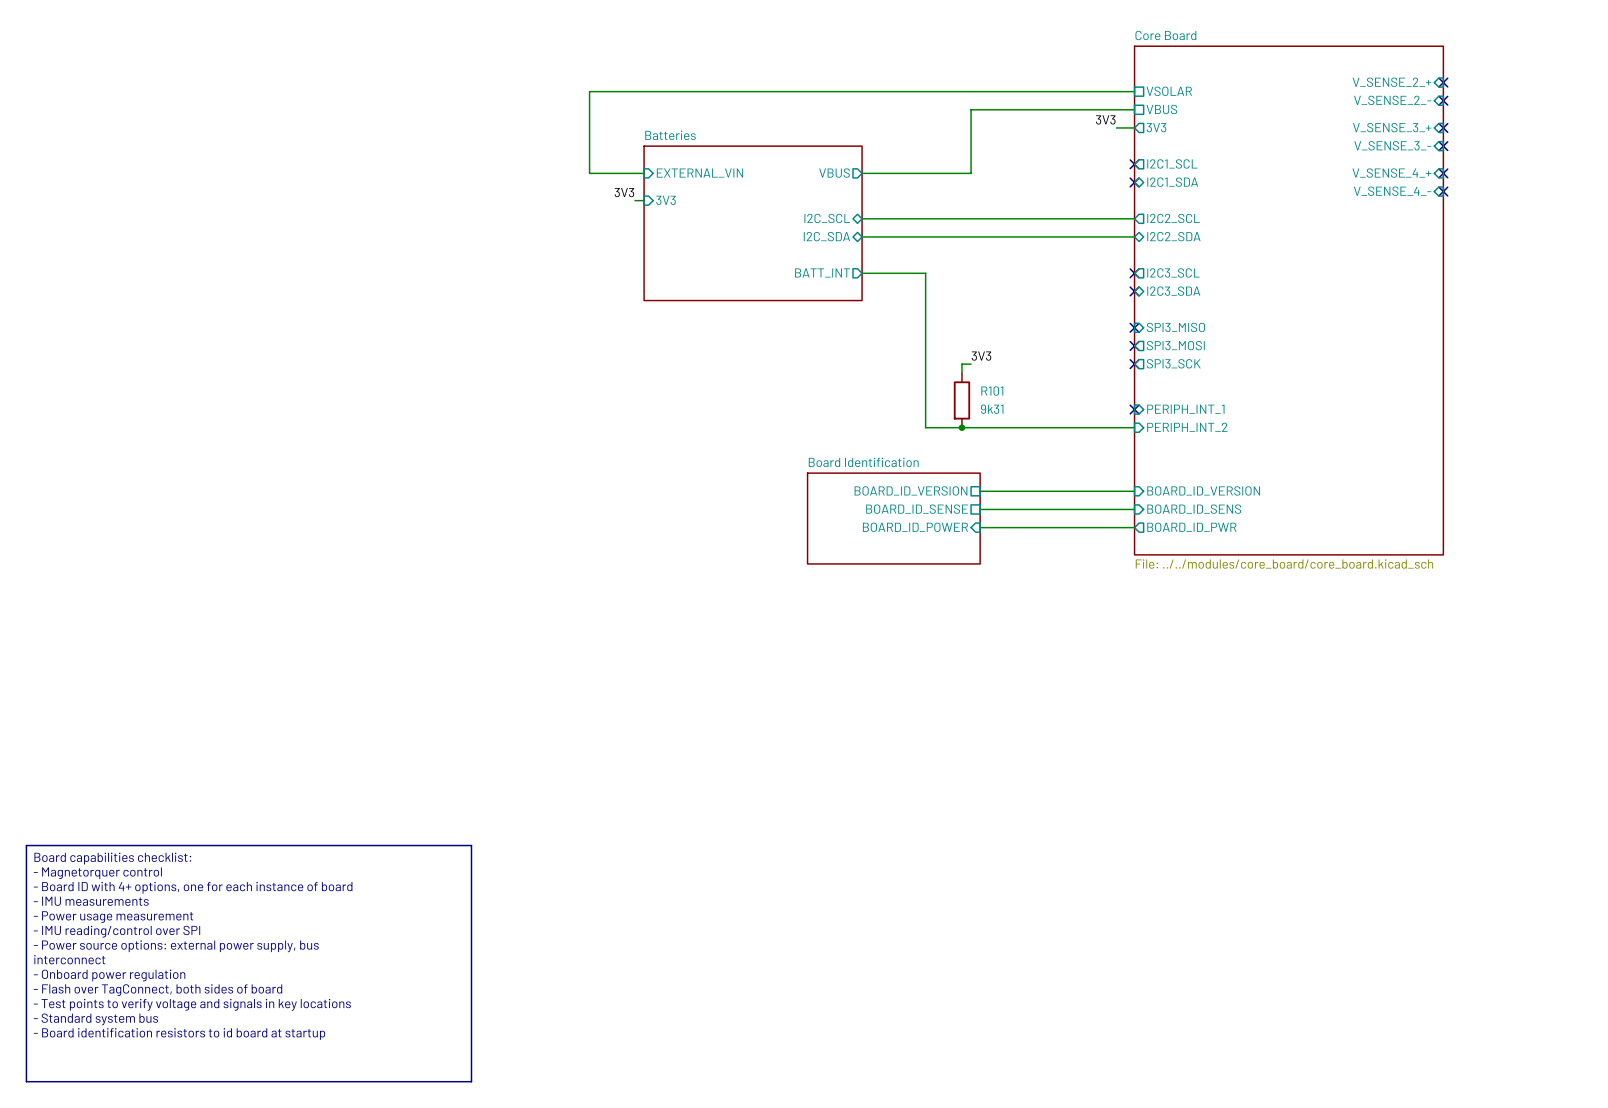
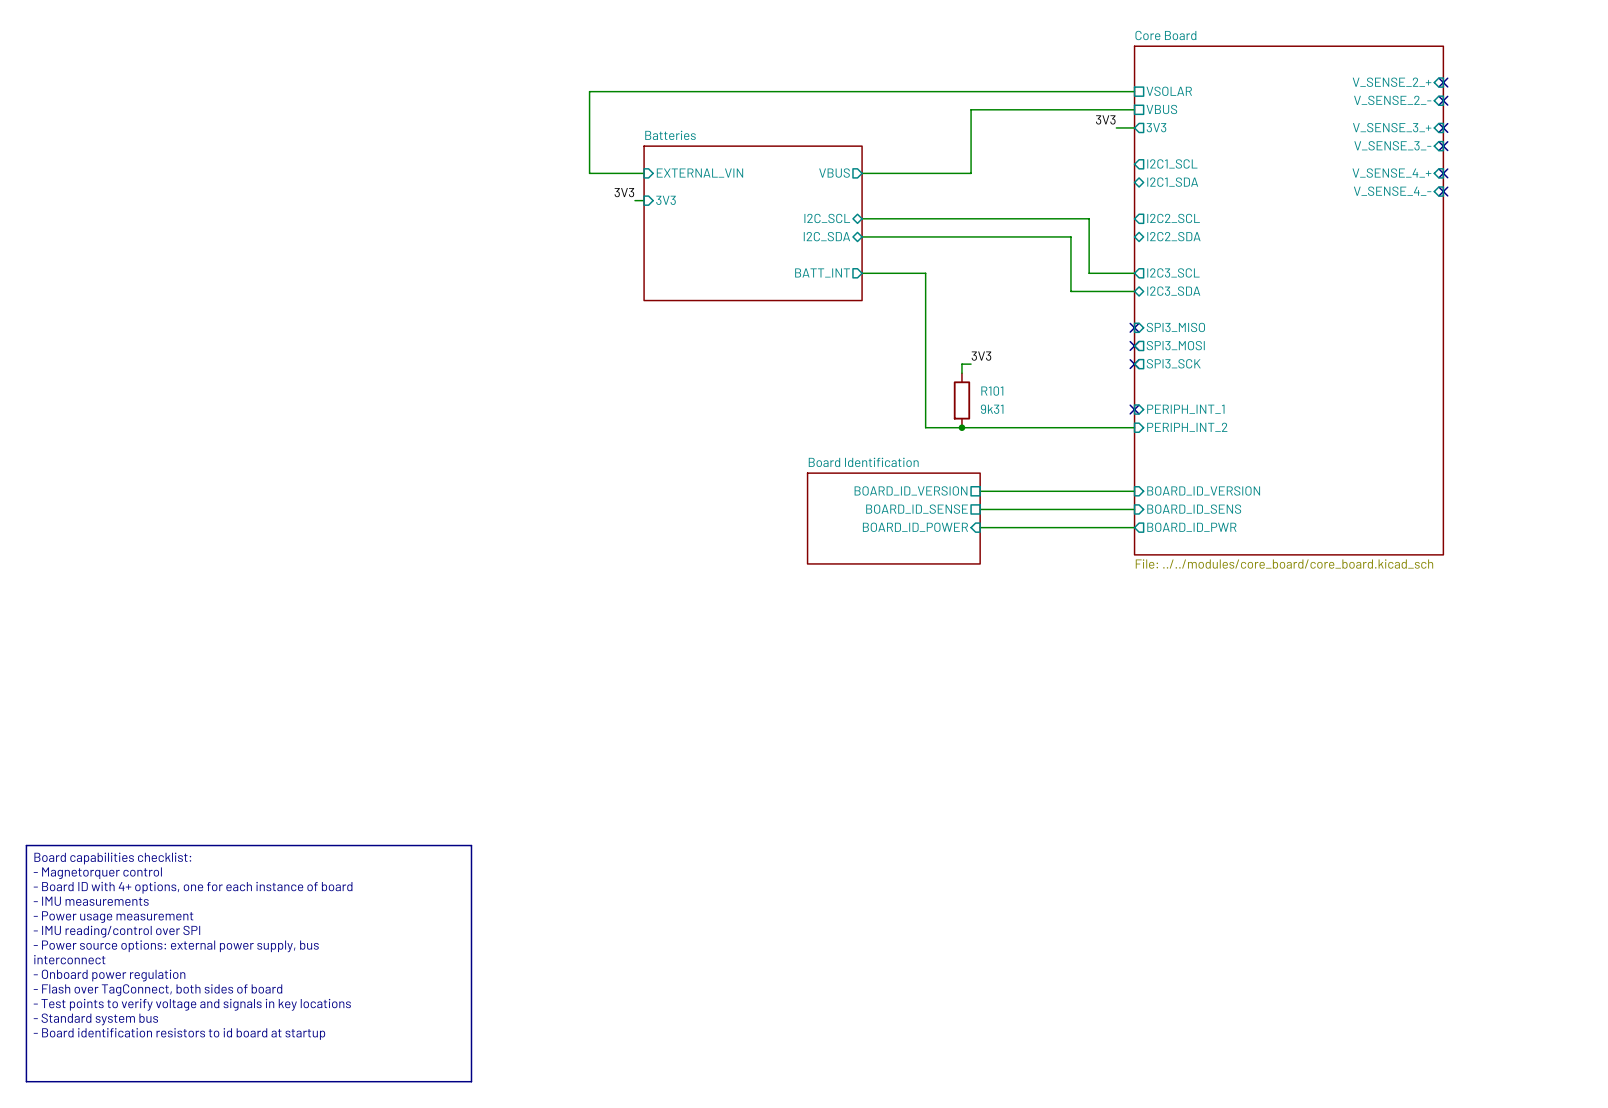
no-connect mark: (1134, 164) -> none
no-connect mark: (1134, 182) -> none
wire: (1089, 218) (1134, 218) -> (1089, 218) (1089, 273) (1134, 273)
wire: (1070, 236) (1134, 236) -> (1070, 236) (1070, 291) (1134, 291)
no-connect mark: (1134, 273) -> none
no-connect mark: (1134, 291) -> none

